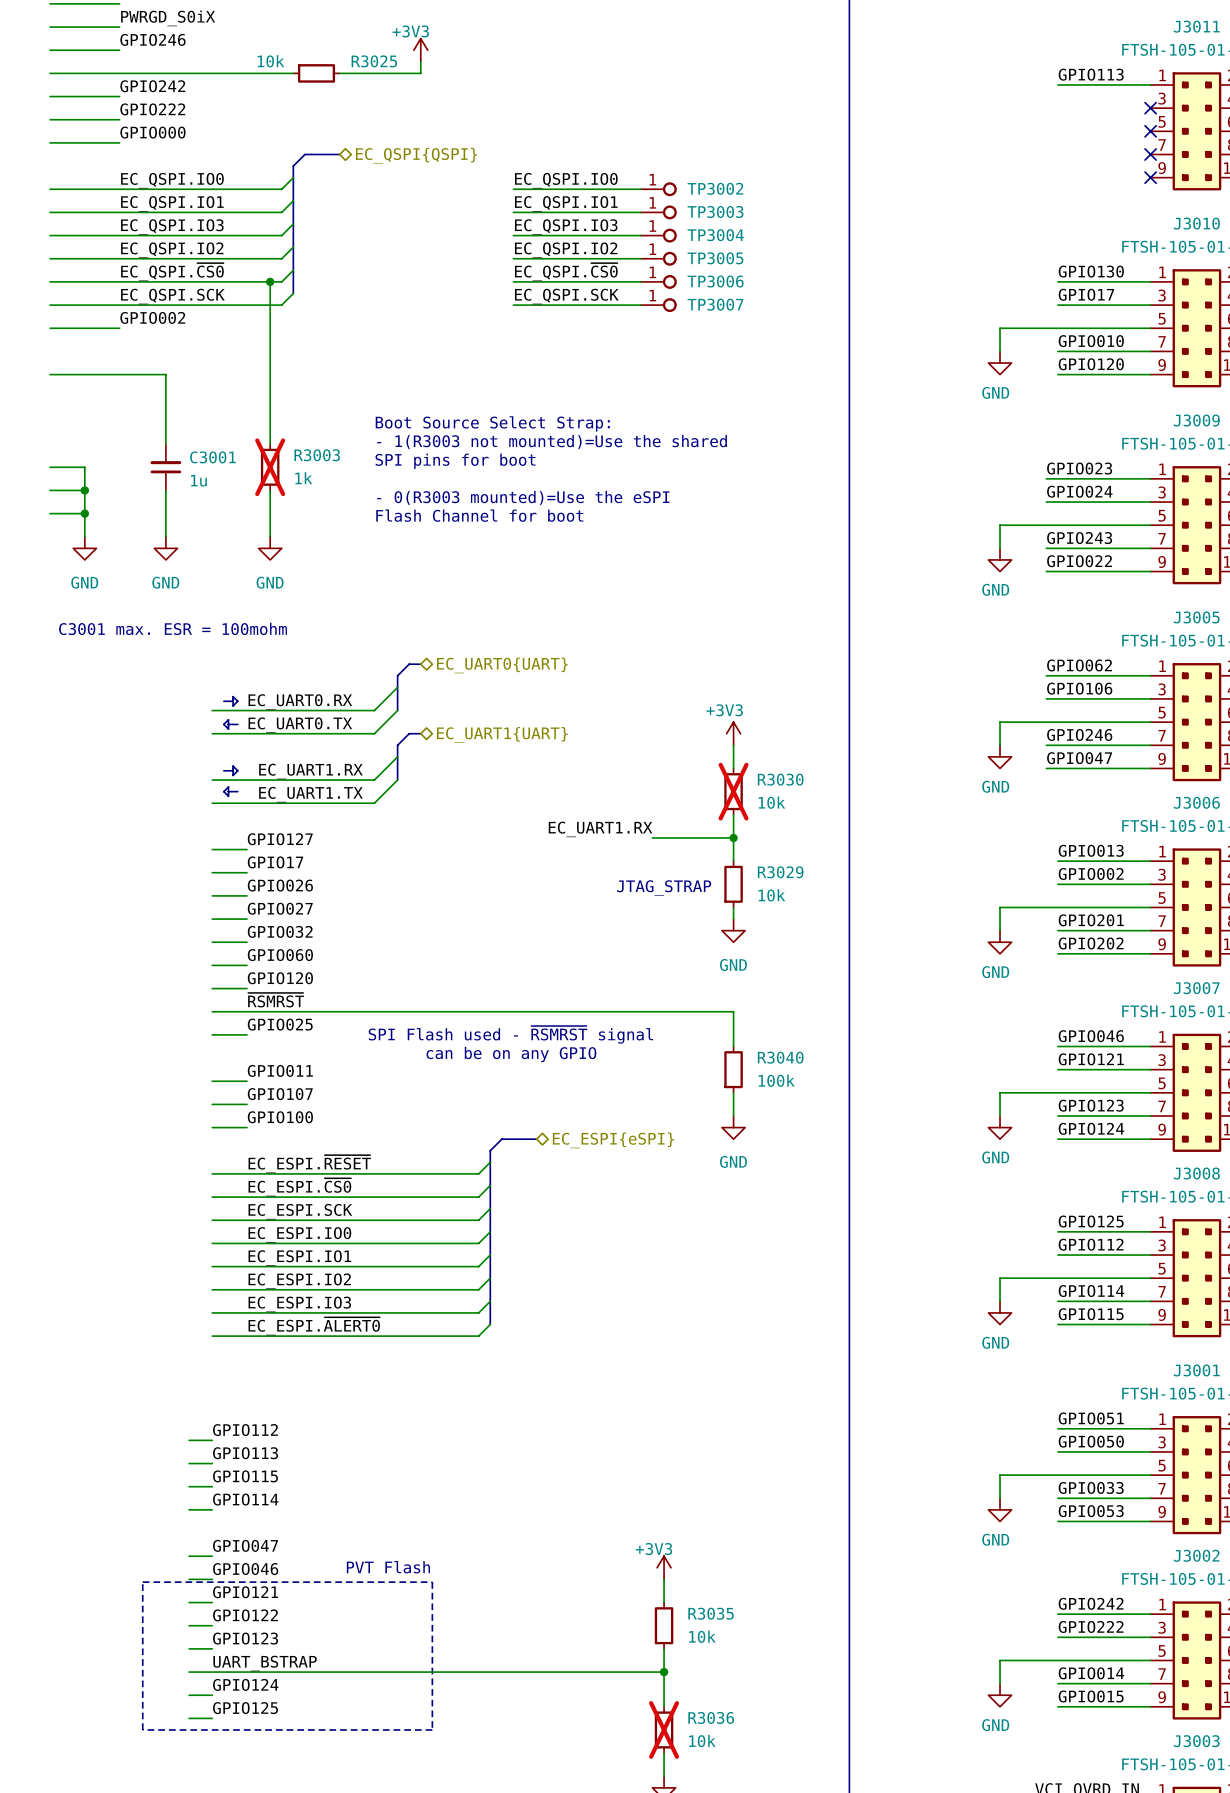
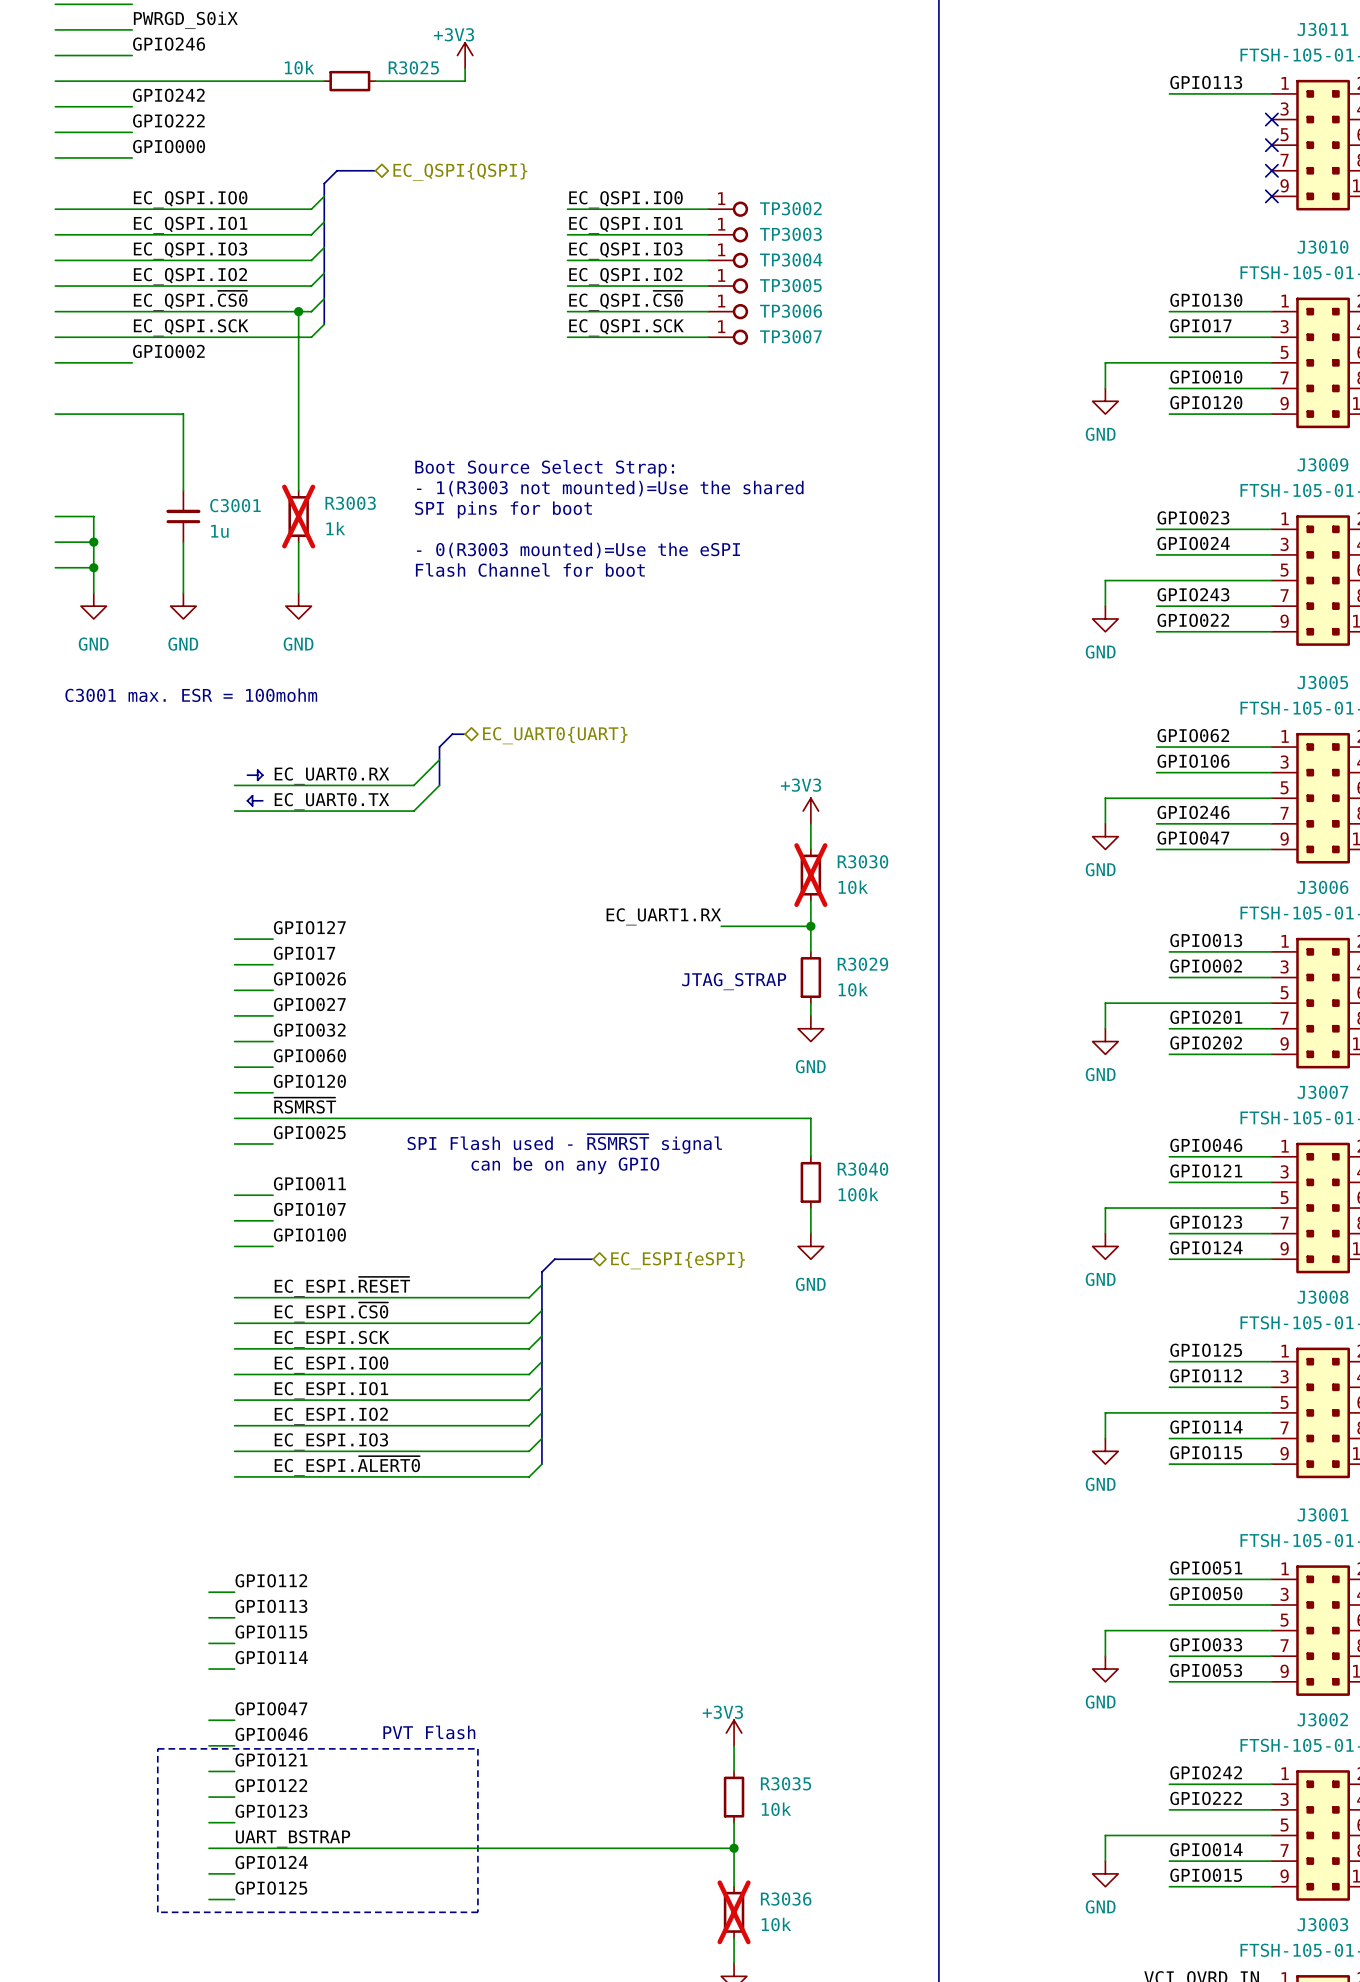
bus: (420, 733) (409, 733) (397, 745) (397, 780) -> none
hierarchical label: EC_UART1{UART} (502, 734) -> none
wire: (397, 756) (374, 780) (212, 780) -> none
line: (233, 766) (233, 775) (237, 770) (233, 766) -> none
line: (223, 770) (233, 770) -> none
label: EC_UART1.RX (310, 771) -> none
wire: (397, 780) (374, 803) (212, 803) -> none
line: (228, 787) (228, 796) (223, 791) (228, 787) -> none
line: (228, 791) (237, 791) -> none
label: EC_UART1.TX (310, 794) -> none

